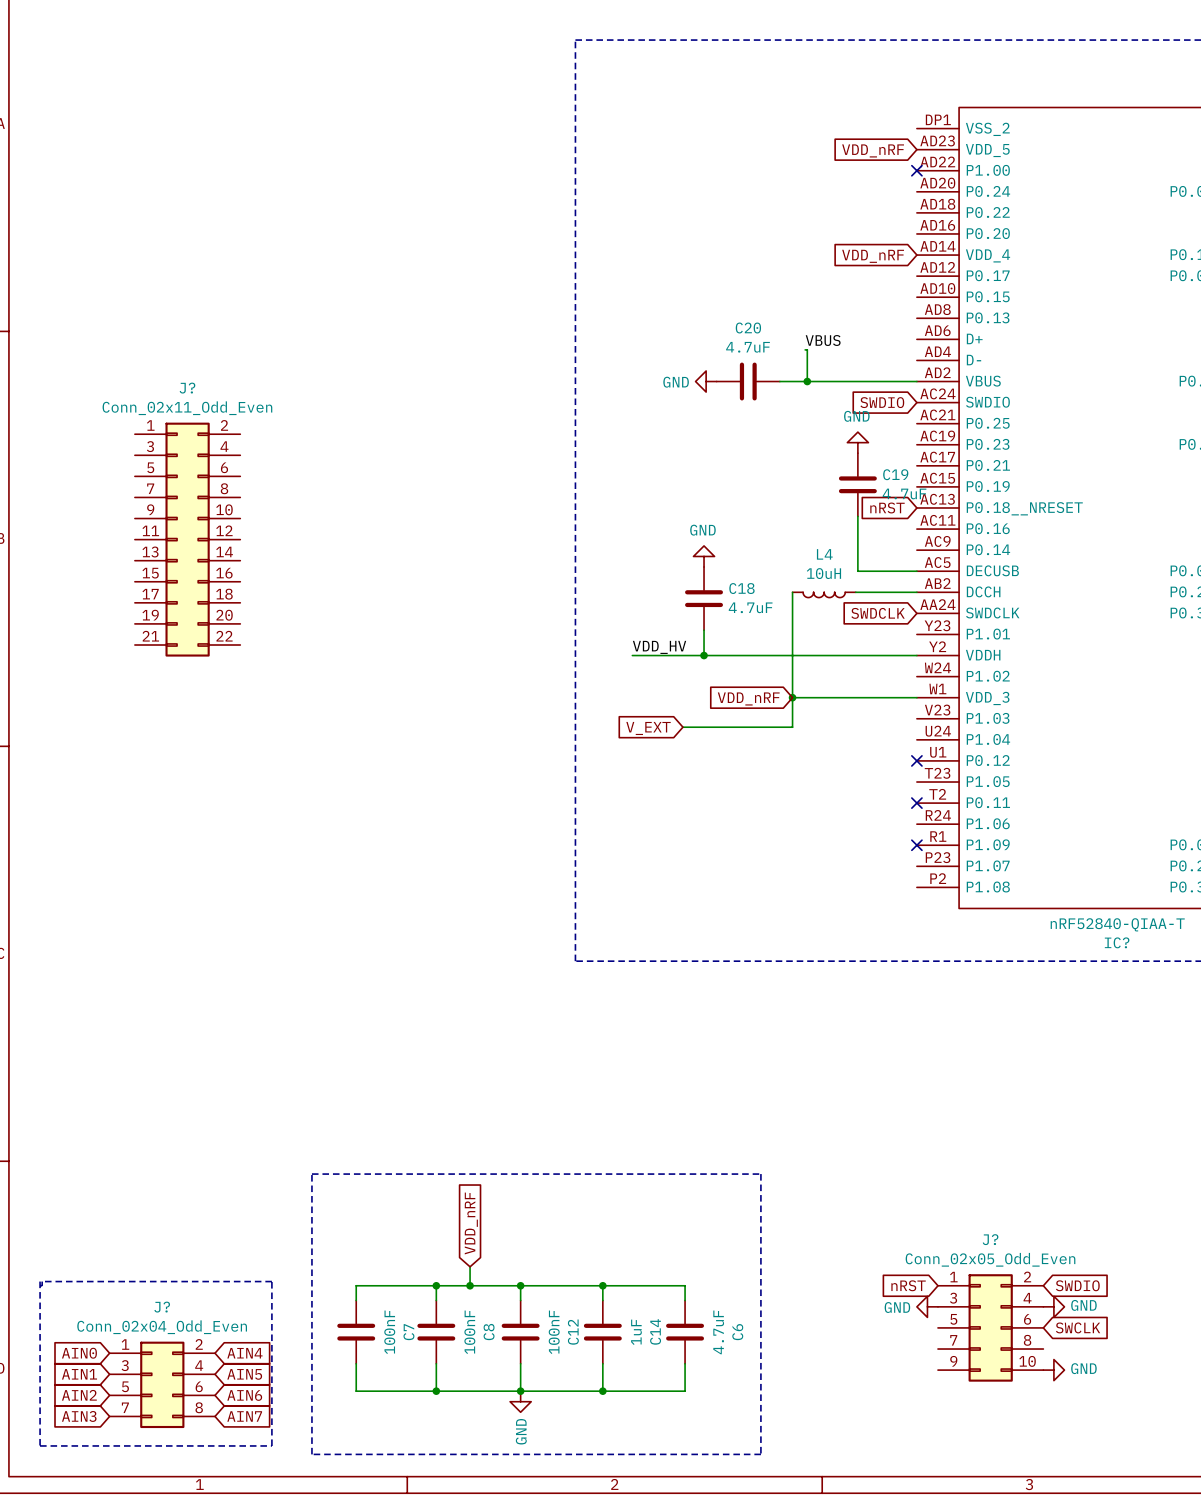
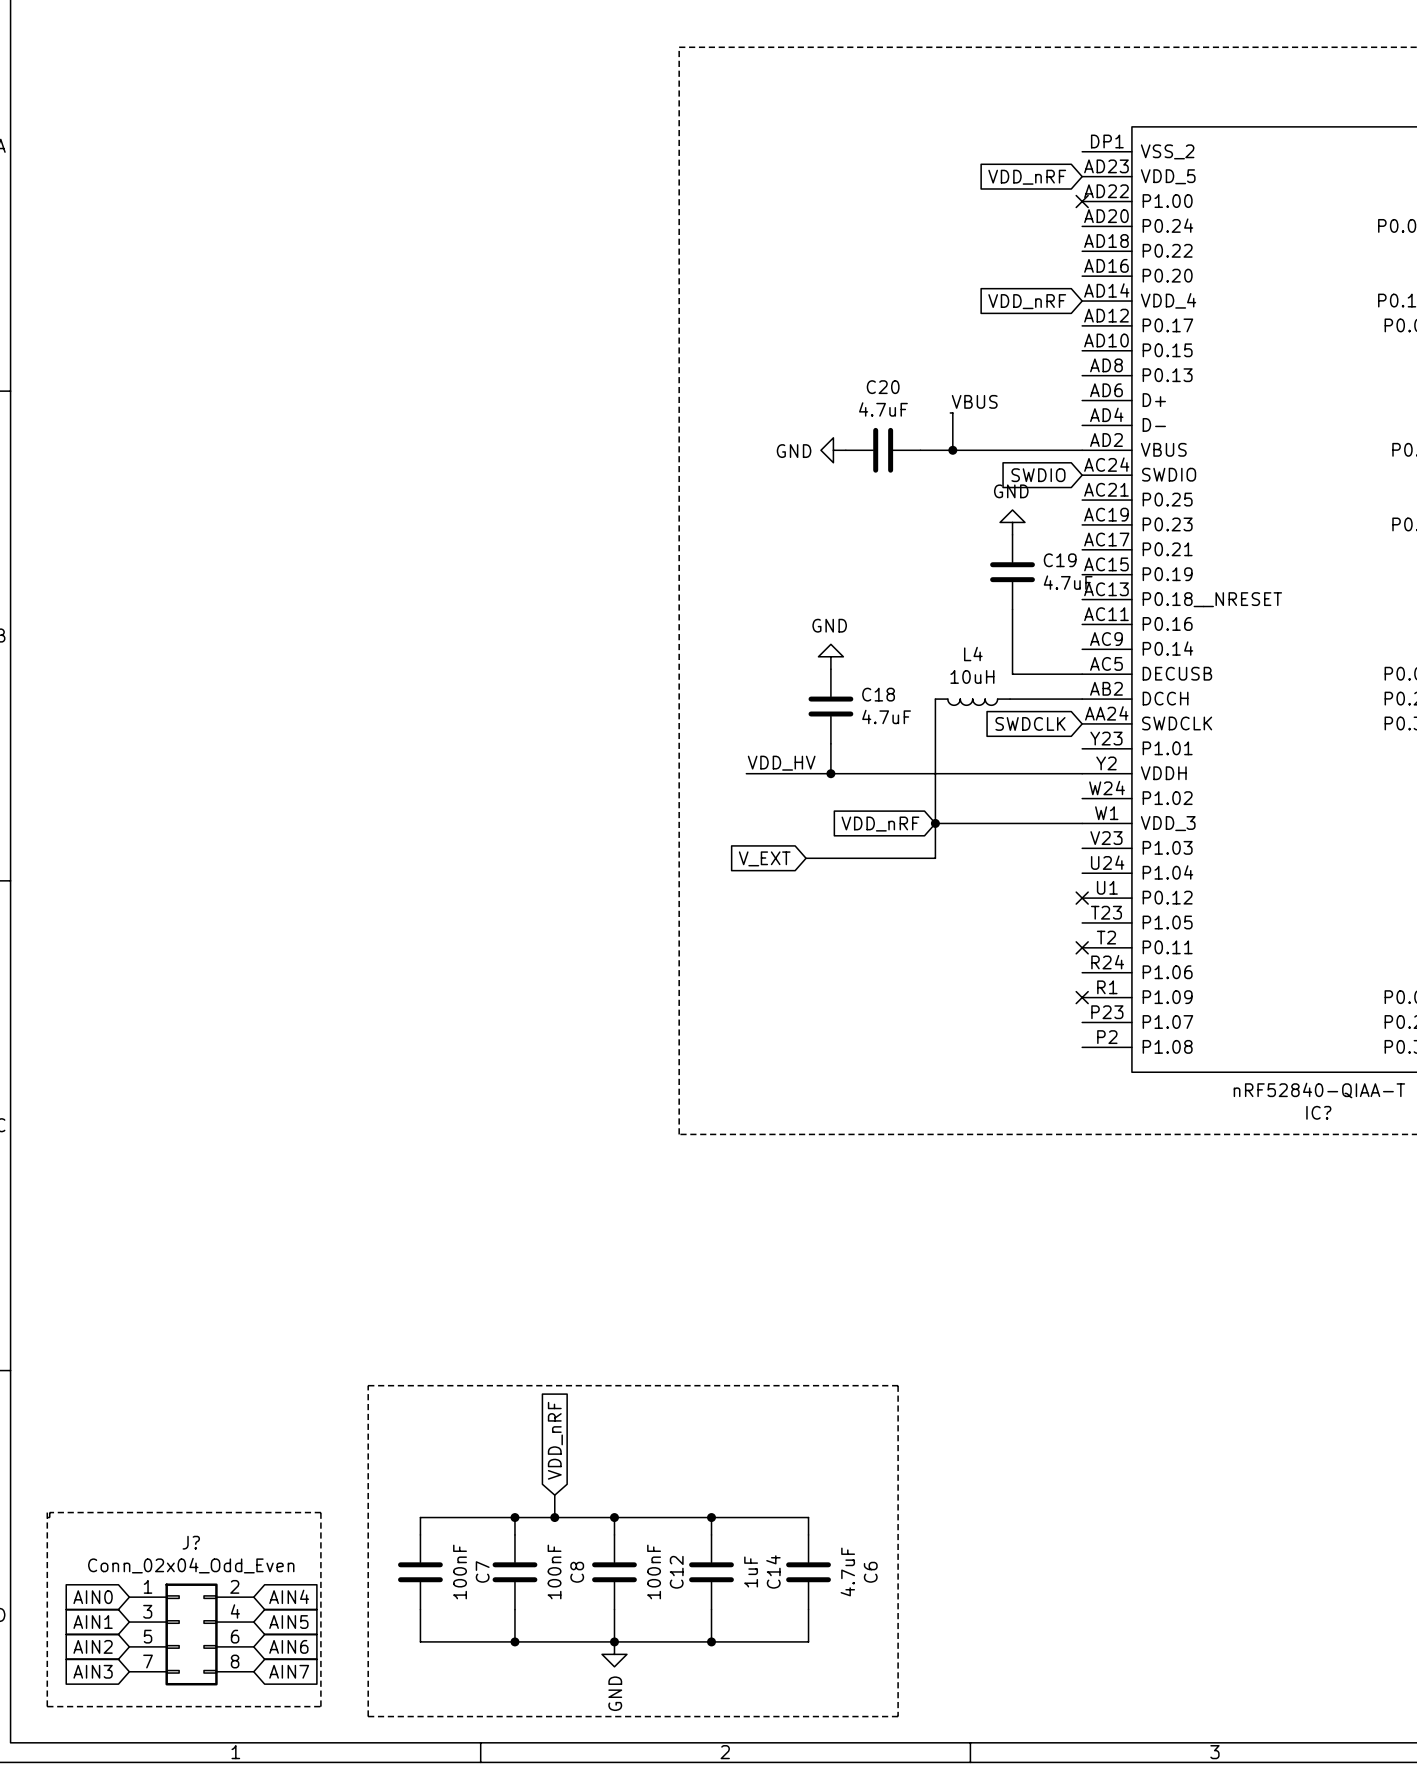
global label: nRST (887, 507) -> none
J?: Conn_02x11_Odd_Even (187, 539) -> none
global label: nRST (908, 1285) -> none
global label: SWDIO (1077, 1285) -> none
power symbol: GND (927, 1306) -> none
power symbol: GND (1053, 1306) -> none
J?: Conn_02x05_Odd_Even (990, 1327) -> none
global label: SWCLK (1078, 1327) -> none
power symbol: GND (1053, 1370) -> none

